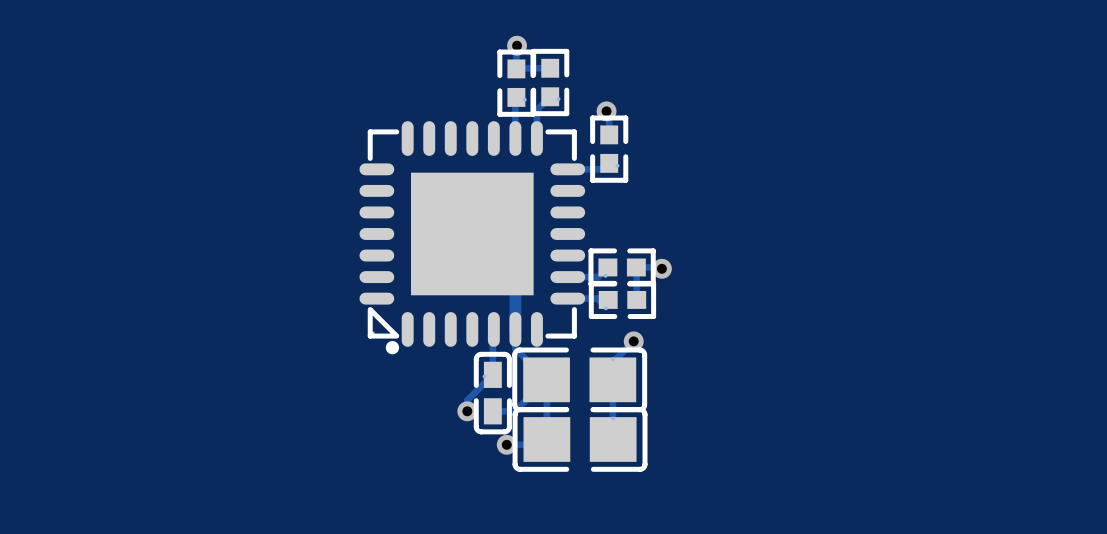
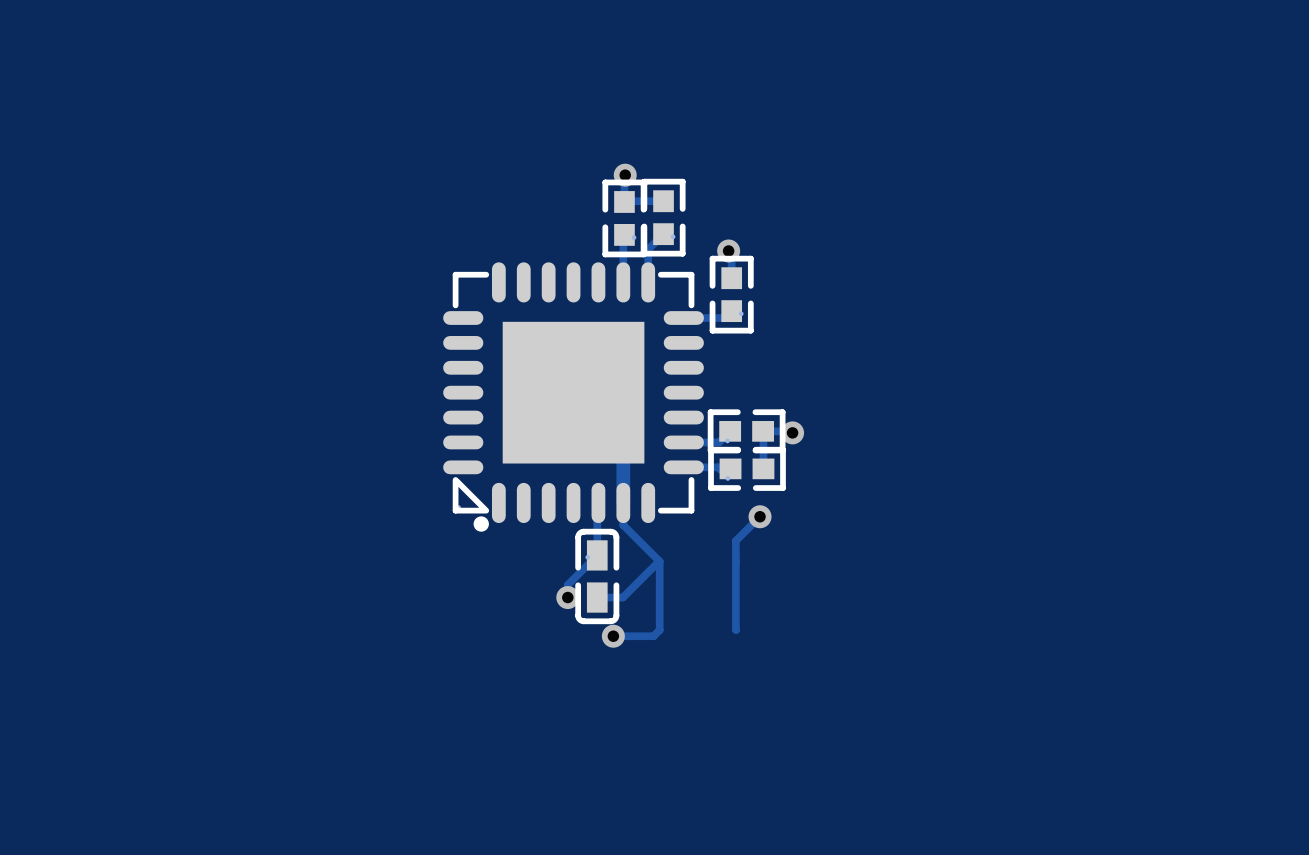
part: (579, 379) -> none
part: (580, 439) -> none

